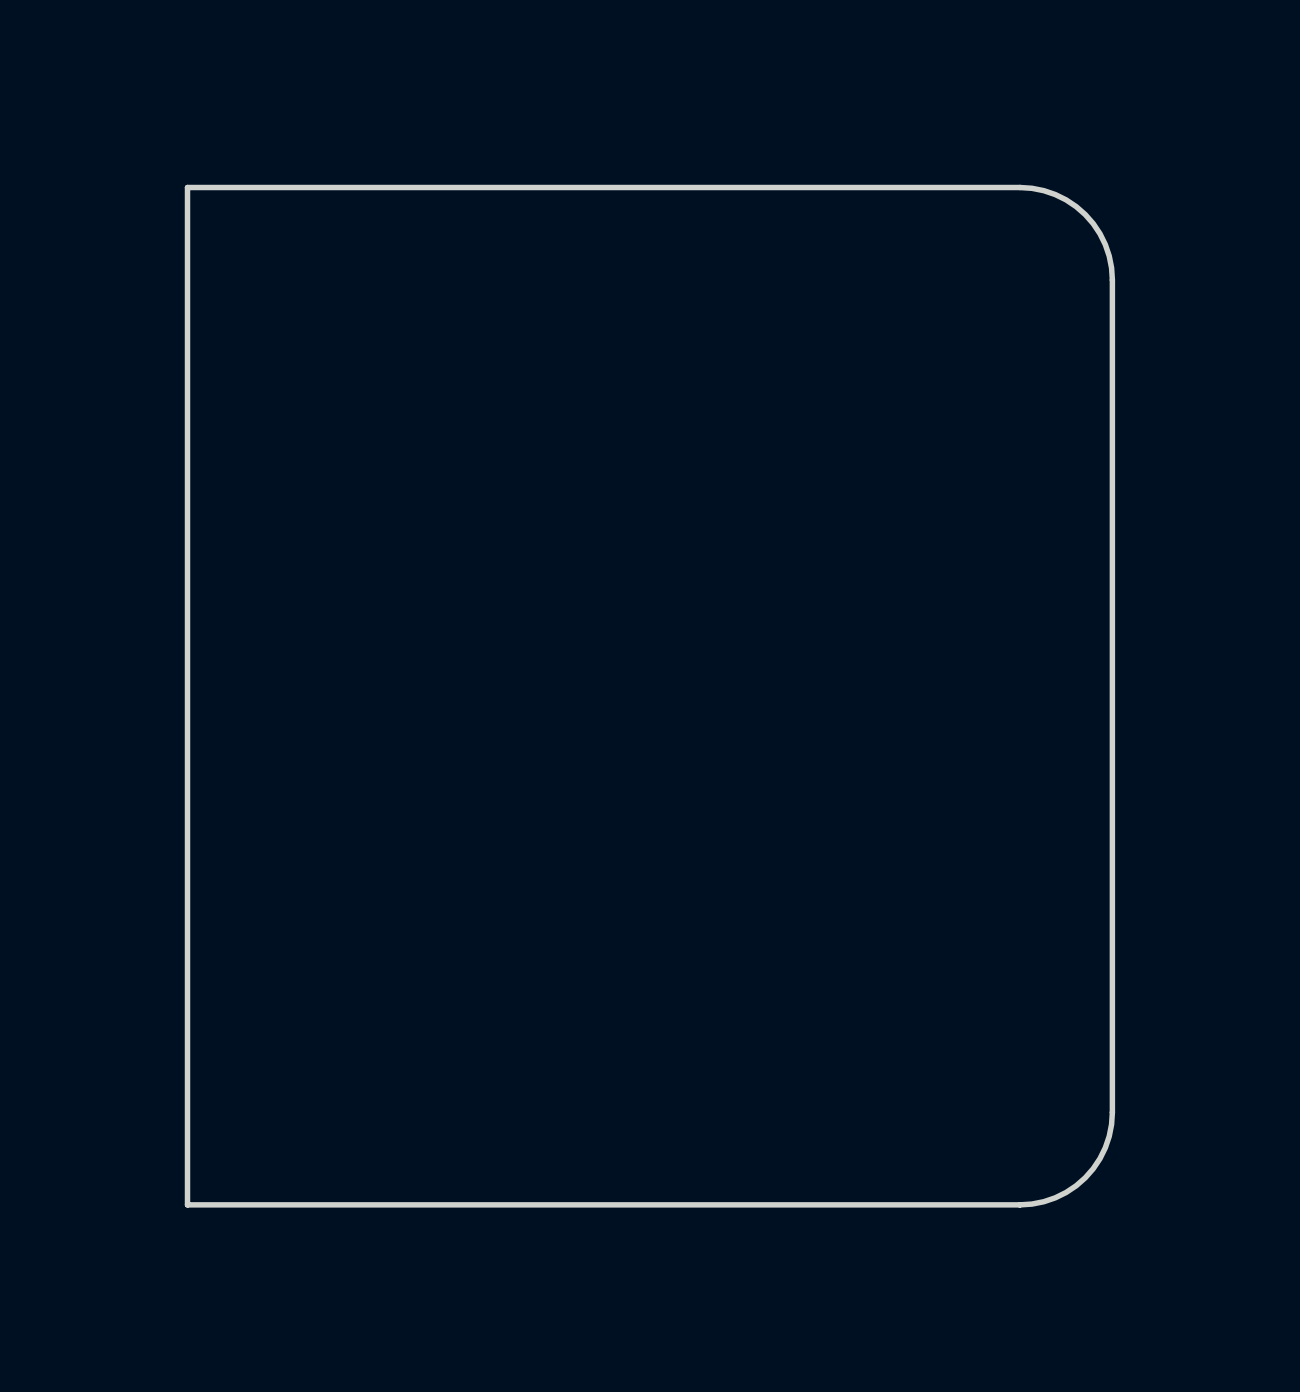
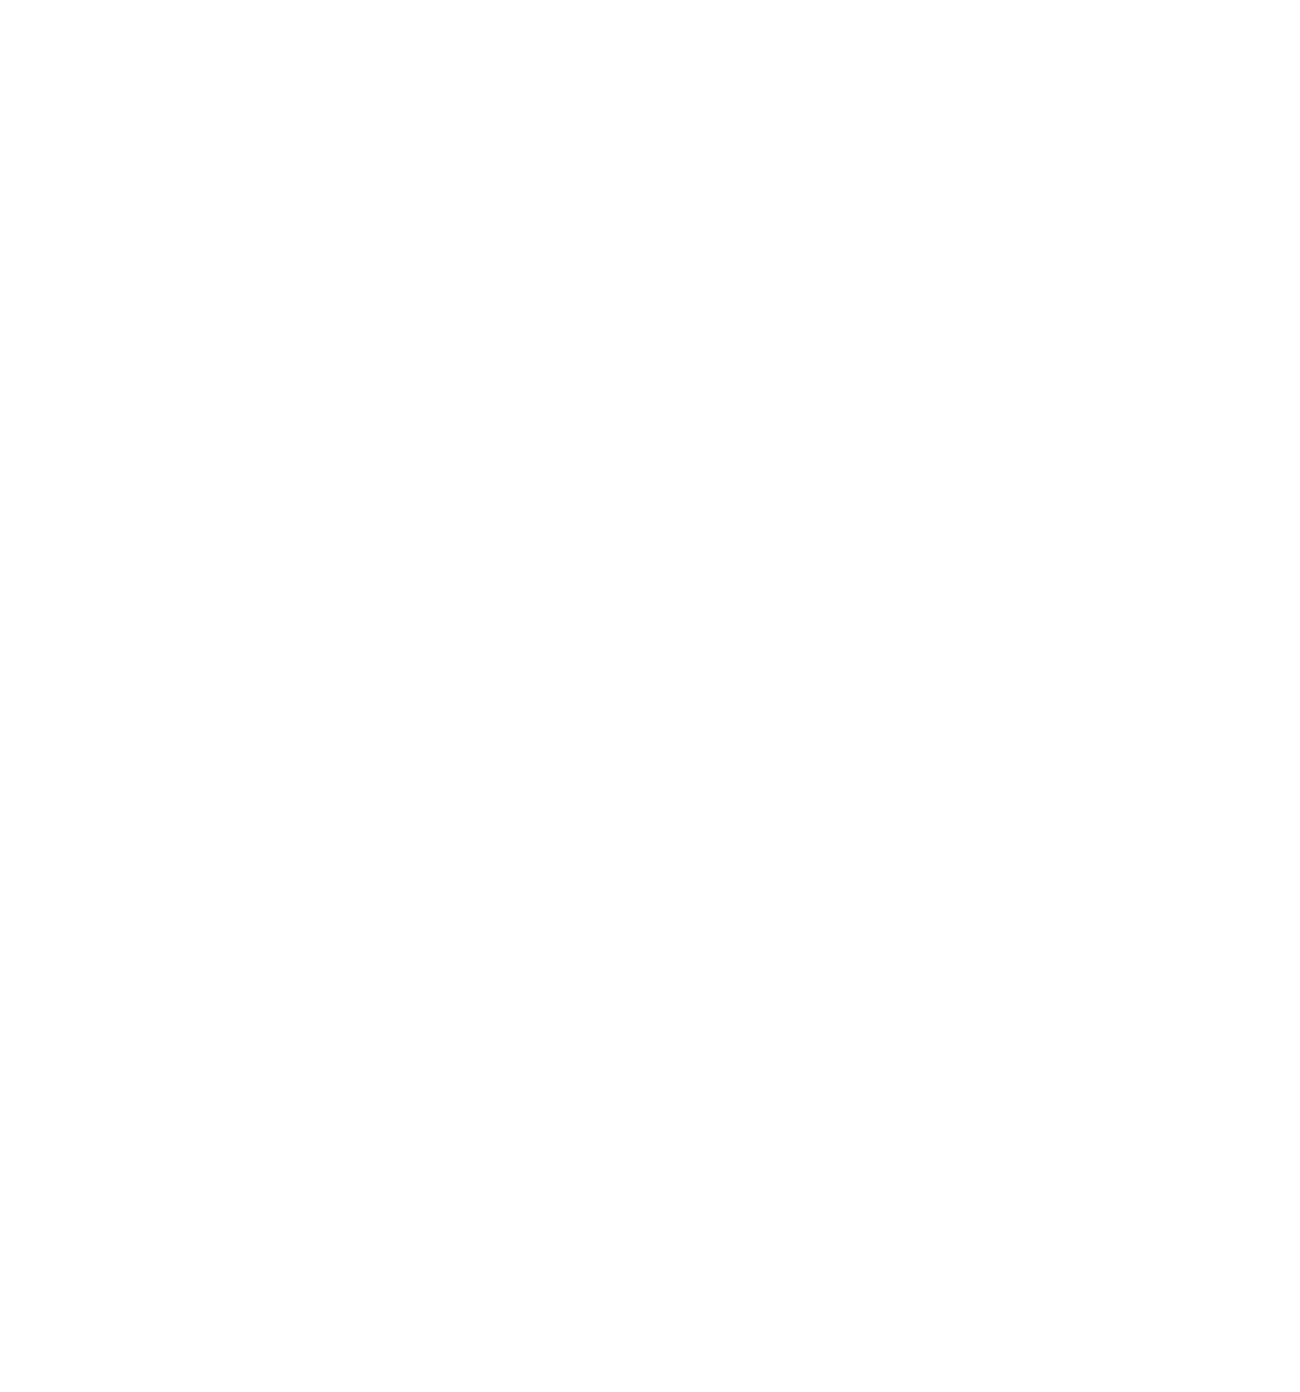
board edge: (187, 187) (1019, 187) (1043, 190) (1055, 194) (1066, 199) (1085, 214) (1093, 223) (1105, 244) (1109, 256) (1112, 279) (1112, 1112) (1109, 1136) (1105, 1147) (1093, 1168) (1085, 1177) (1066, 1192) (1055, 1197) (1043, 1201) (1019, 1204) (187, 1204) (187, 187) -> none

